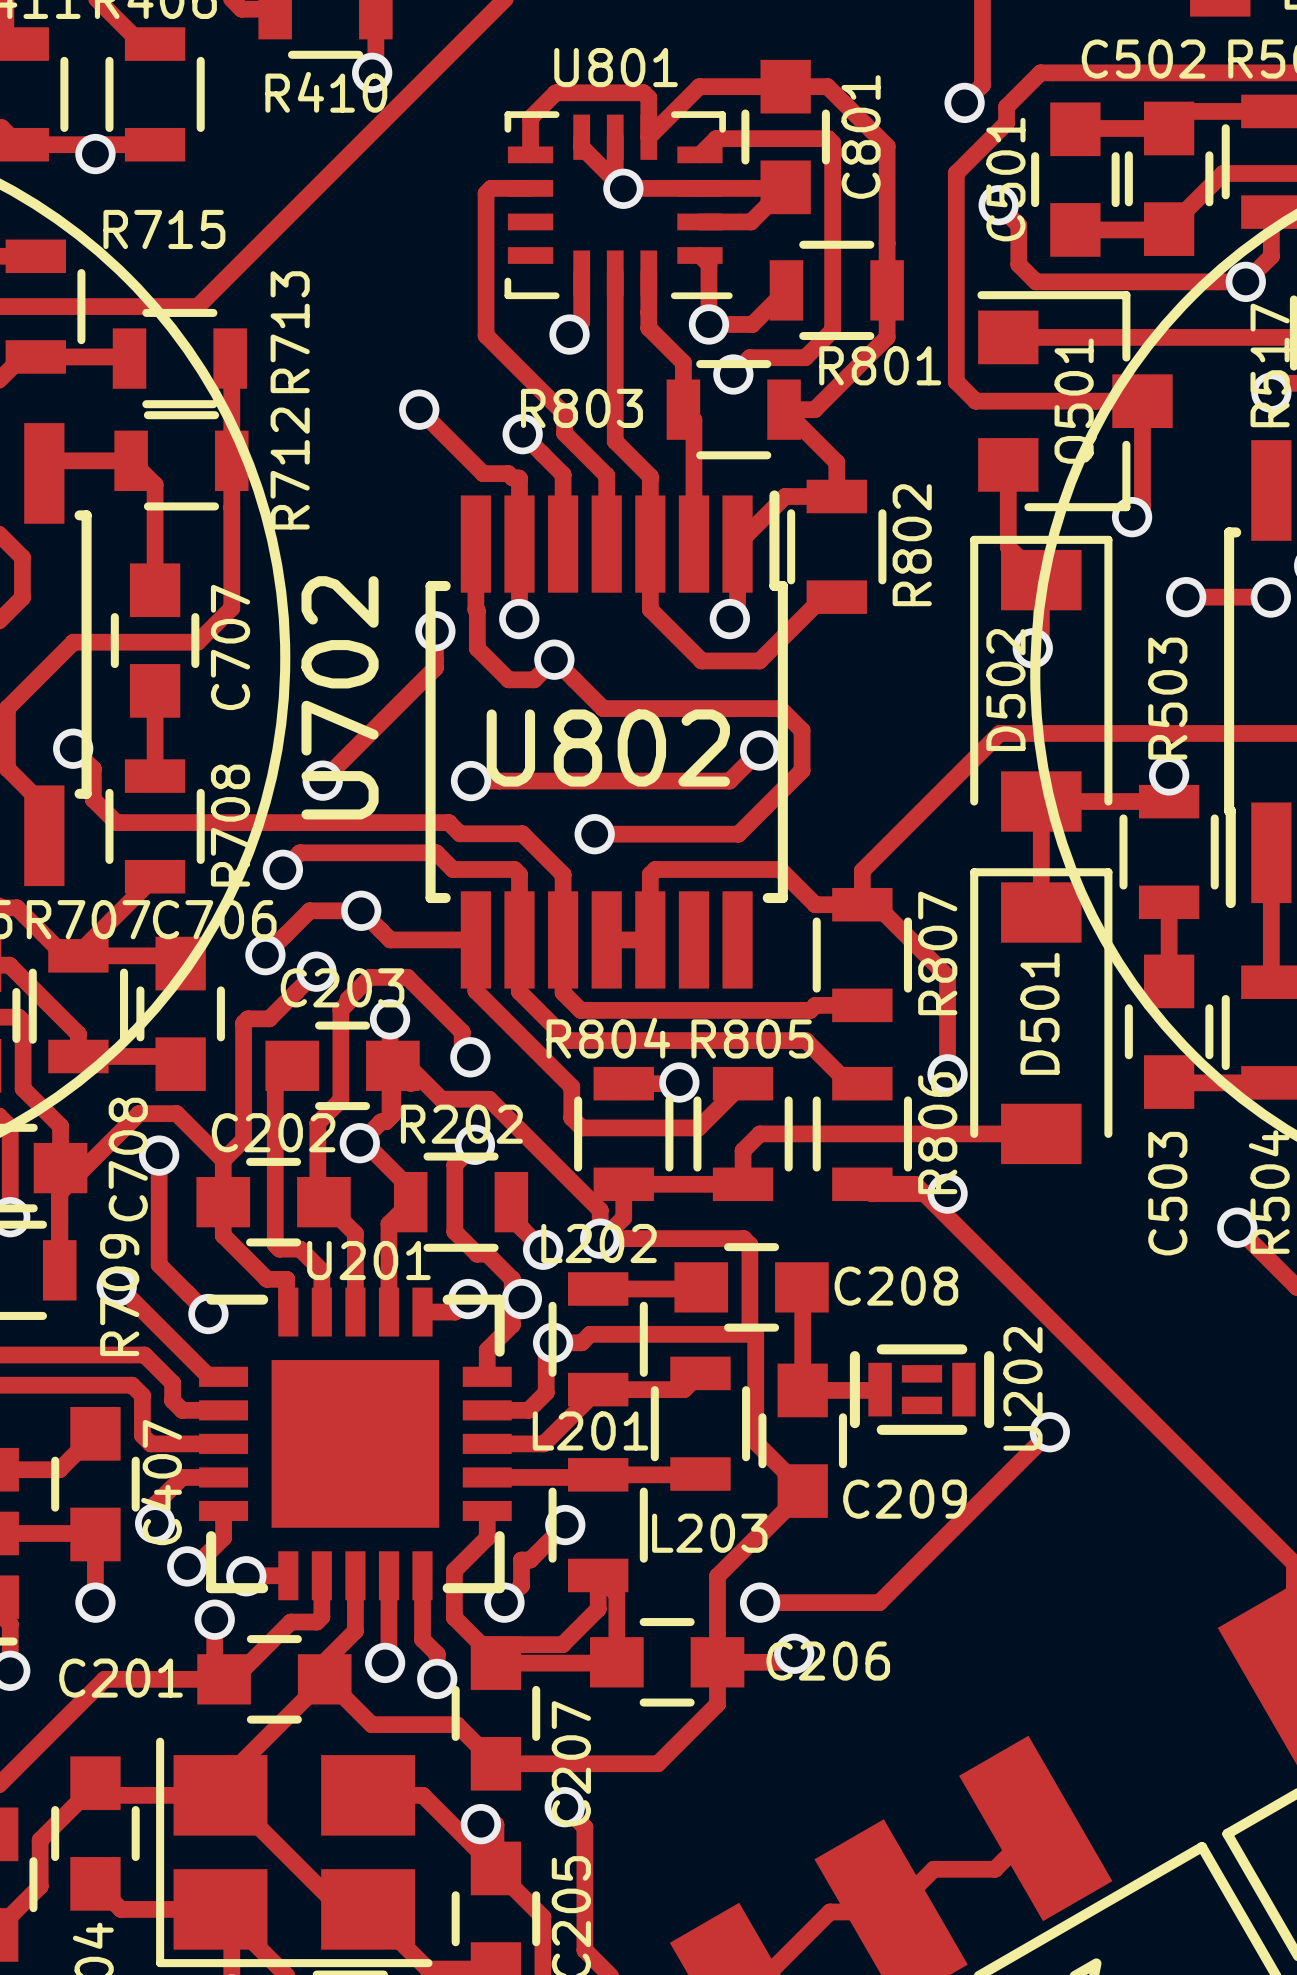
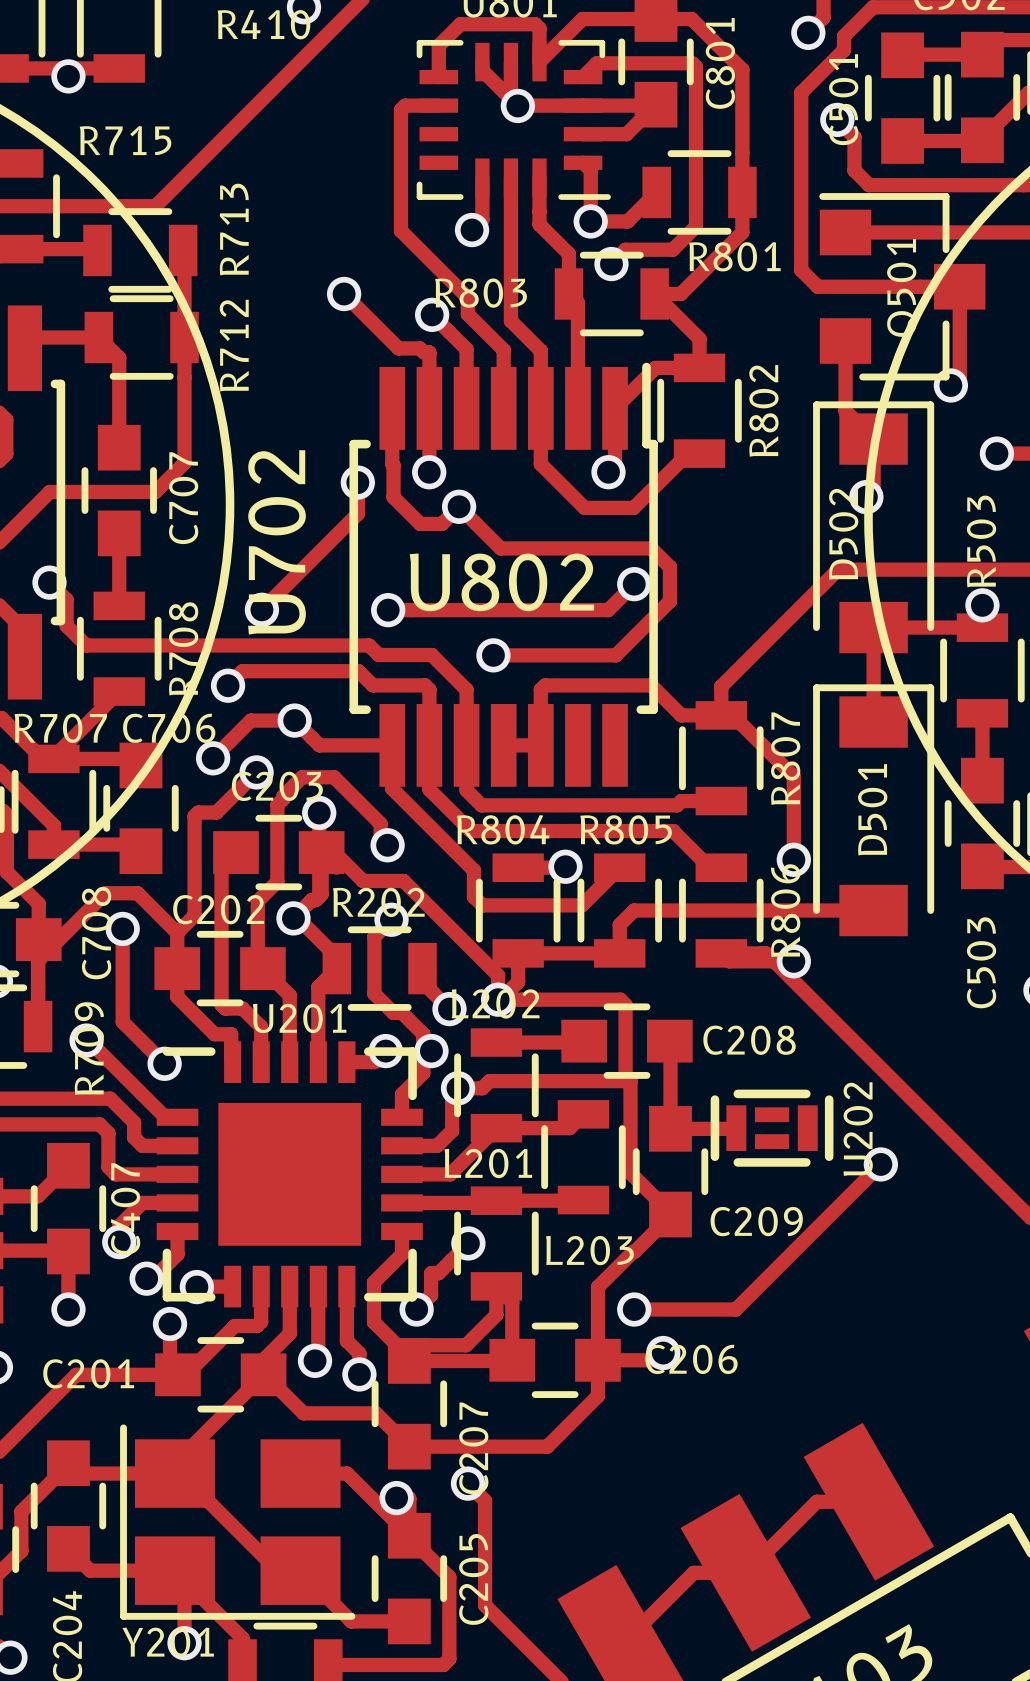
track: (1035, 1828) (994, 1869) (933, 1869) -> (868, 1501) (816, 1501) (782, 1536)

